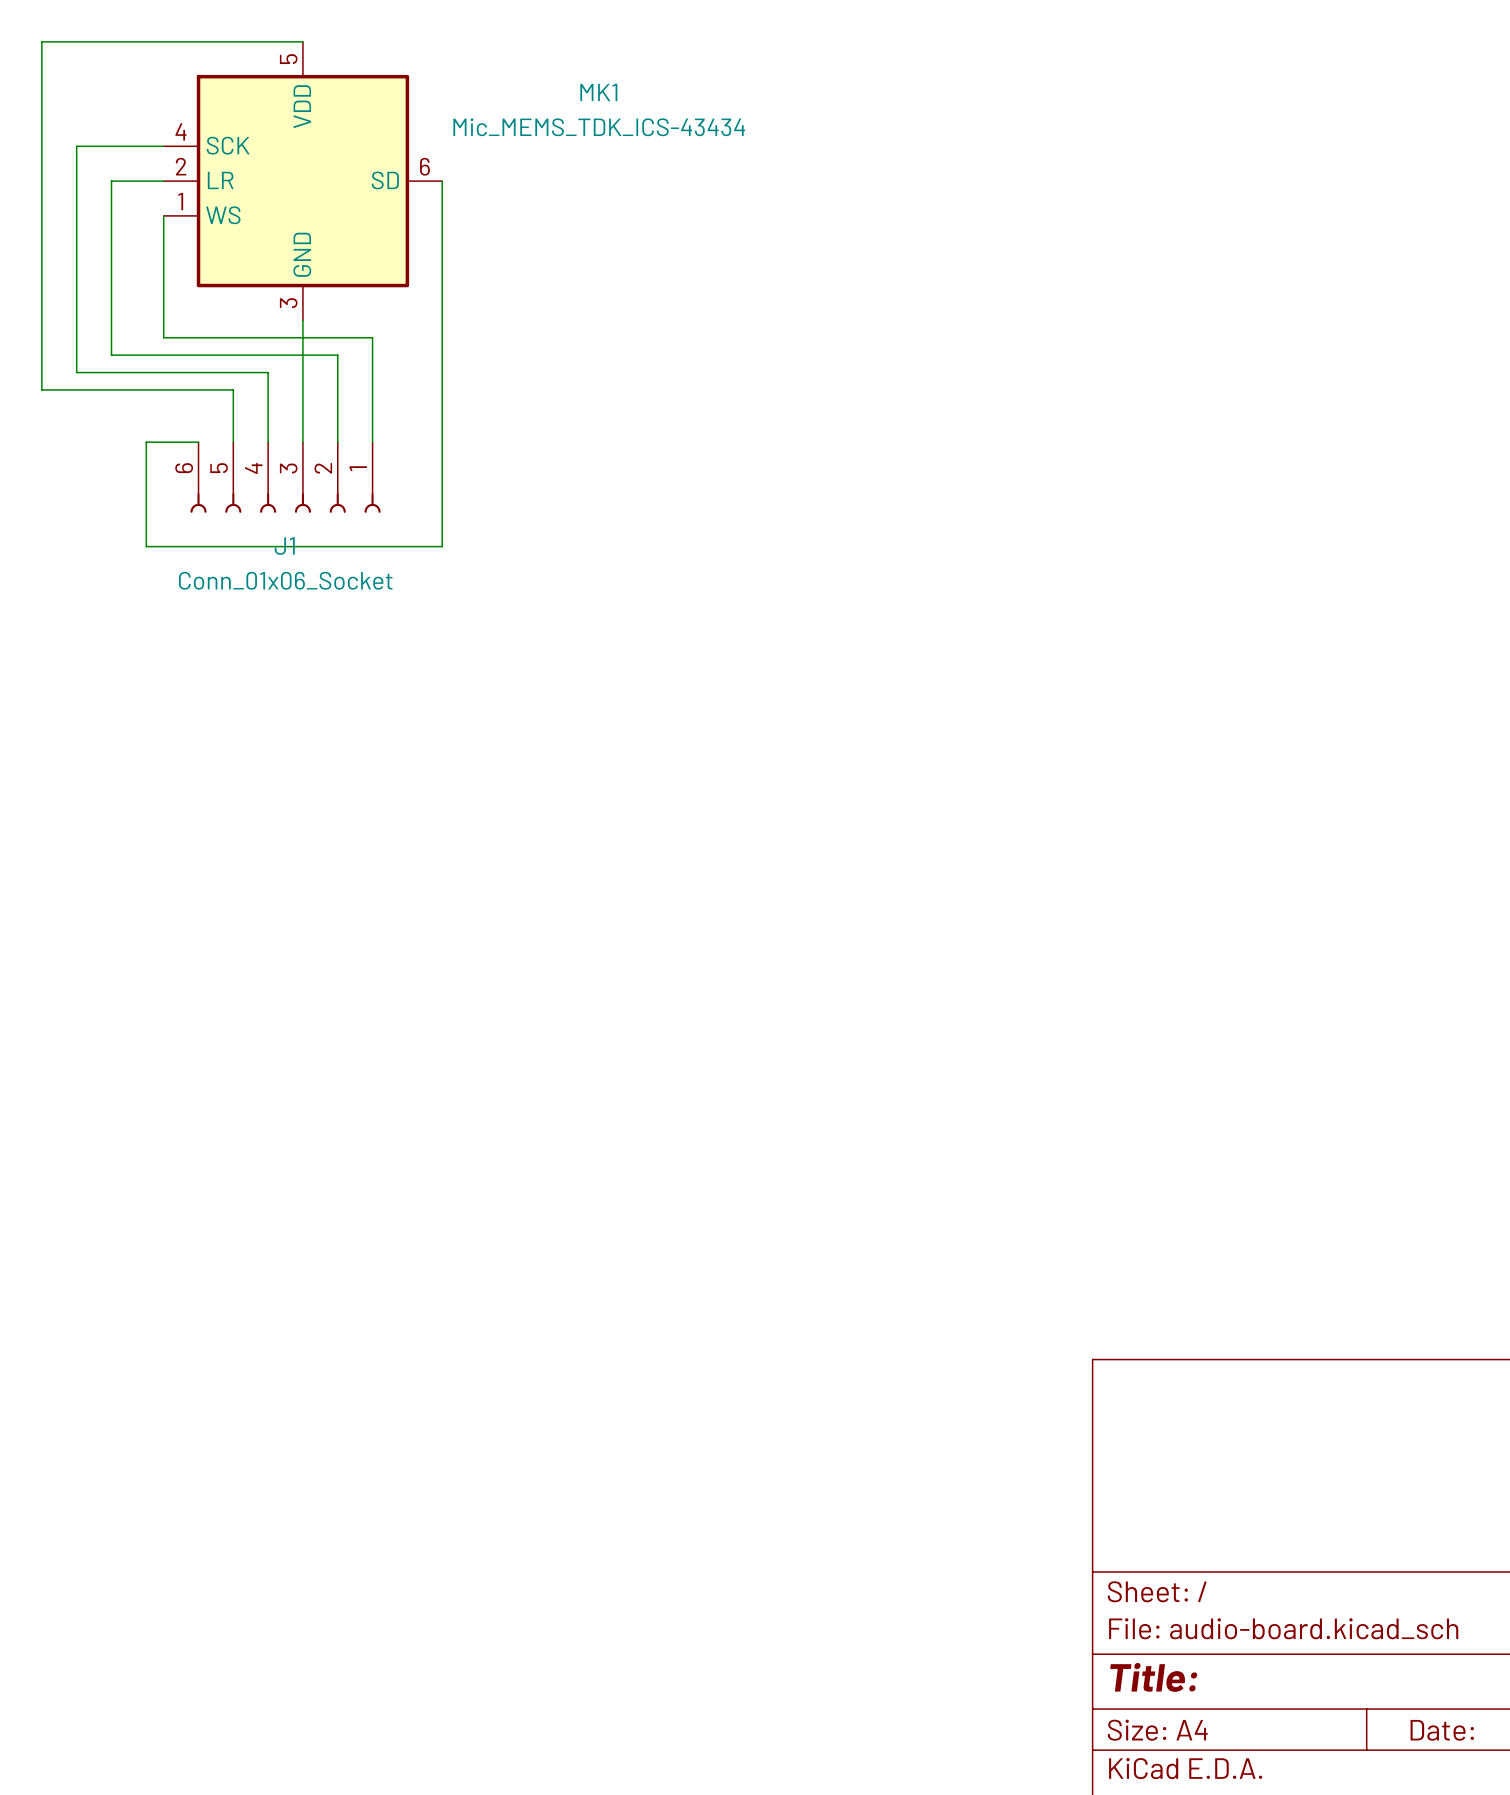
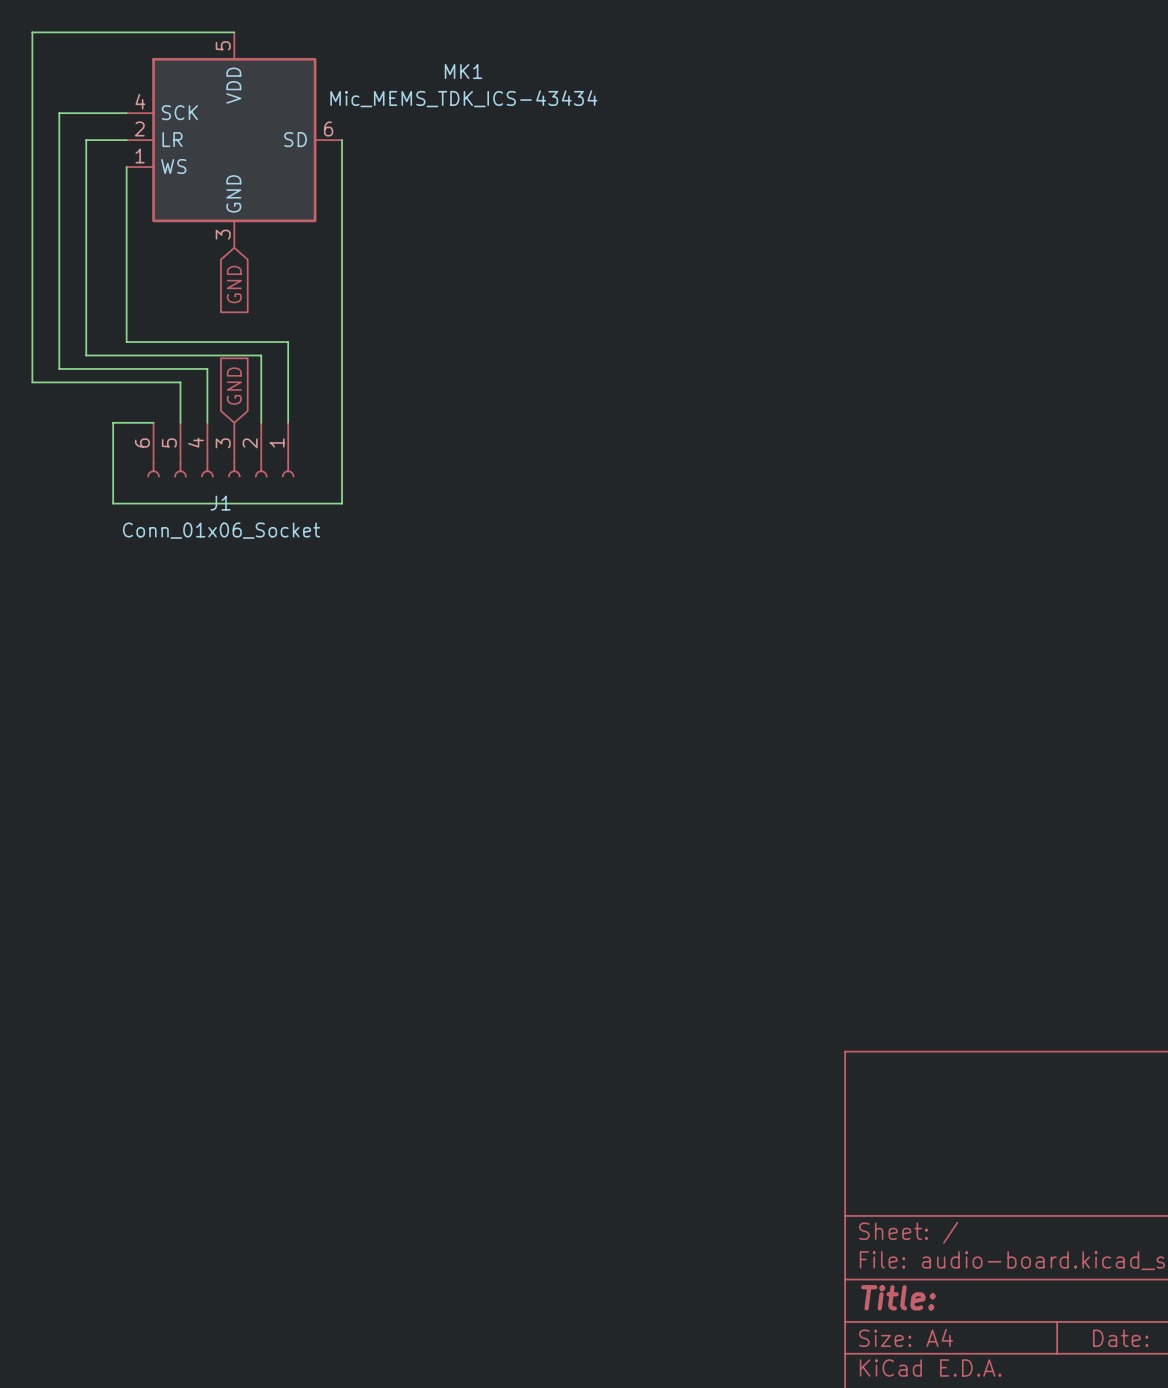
wire: (302, 320) (302, 442) -> none
wire: (163, 337) (372, 337) (372, 442) -> (126, 261) (126, 342)
wire: (111, 355) (337, 355) (337, 442) -> (86, 274) (86, 355) (261, 355) (261, 422)
global label: none -> GND (234, 284)
wire: (76, 372) (268, 372) (268, 442) -> (59, 288) (59, 368) (207, 368) (207, 422)
wire: (41, 389) (233, 389) (233, 442) -> (32, 301) (32, 382) (180, 382) (180, 422)
wire: (163, 442) (146, 442) (146, 546) -> none
wire: none -> (153, 342) (288, 342) (288, 422)
J1 position: (285, 477) -> (220, 450)
global label: none -> GND (234, 386)
wire: (198, 546) (442, 546) -> (113, 422) (113, 503) (342, 503) (342, 422)

